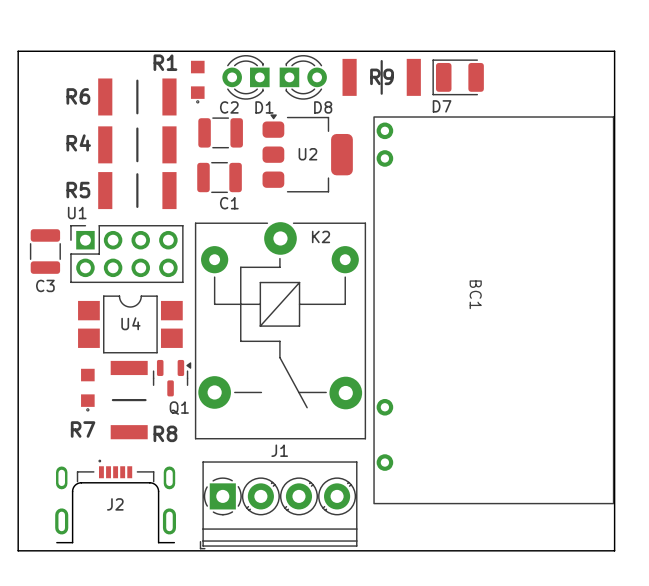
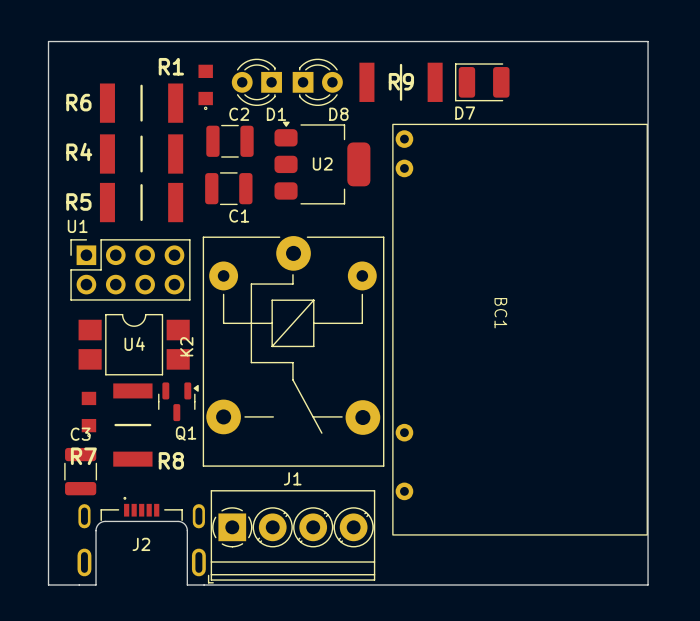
board edge: (18, 51) (614, 51) (614, 550) (18, 550) (18, 51) -> none
K2 name rotation: 0° (321, 236) -> 90° counterclockwise (186, 346)
K2 name position: K2 (321, 236) -> K2 (186, 346)
C3 position: (45, 251) -> (80, 471)
C3 name position: C3 (45, 285) -> C3 (80, 434)
J2 position: (115, 501) -> (141, 540)
board edge: none -> (79, 585) (48, 585) (48, 41) (648, 41) (648, 585) (204, 585)

